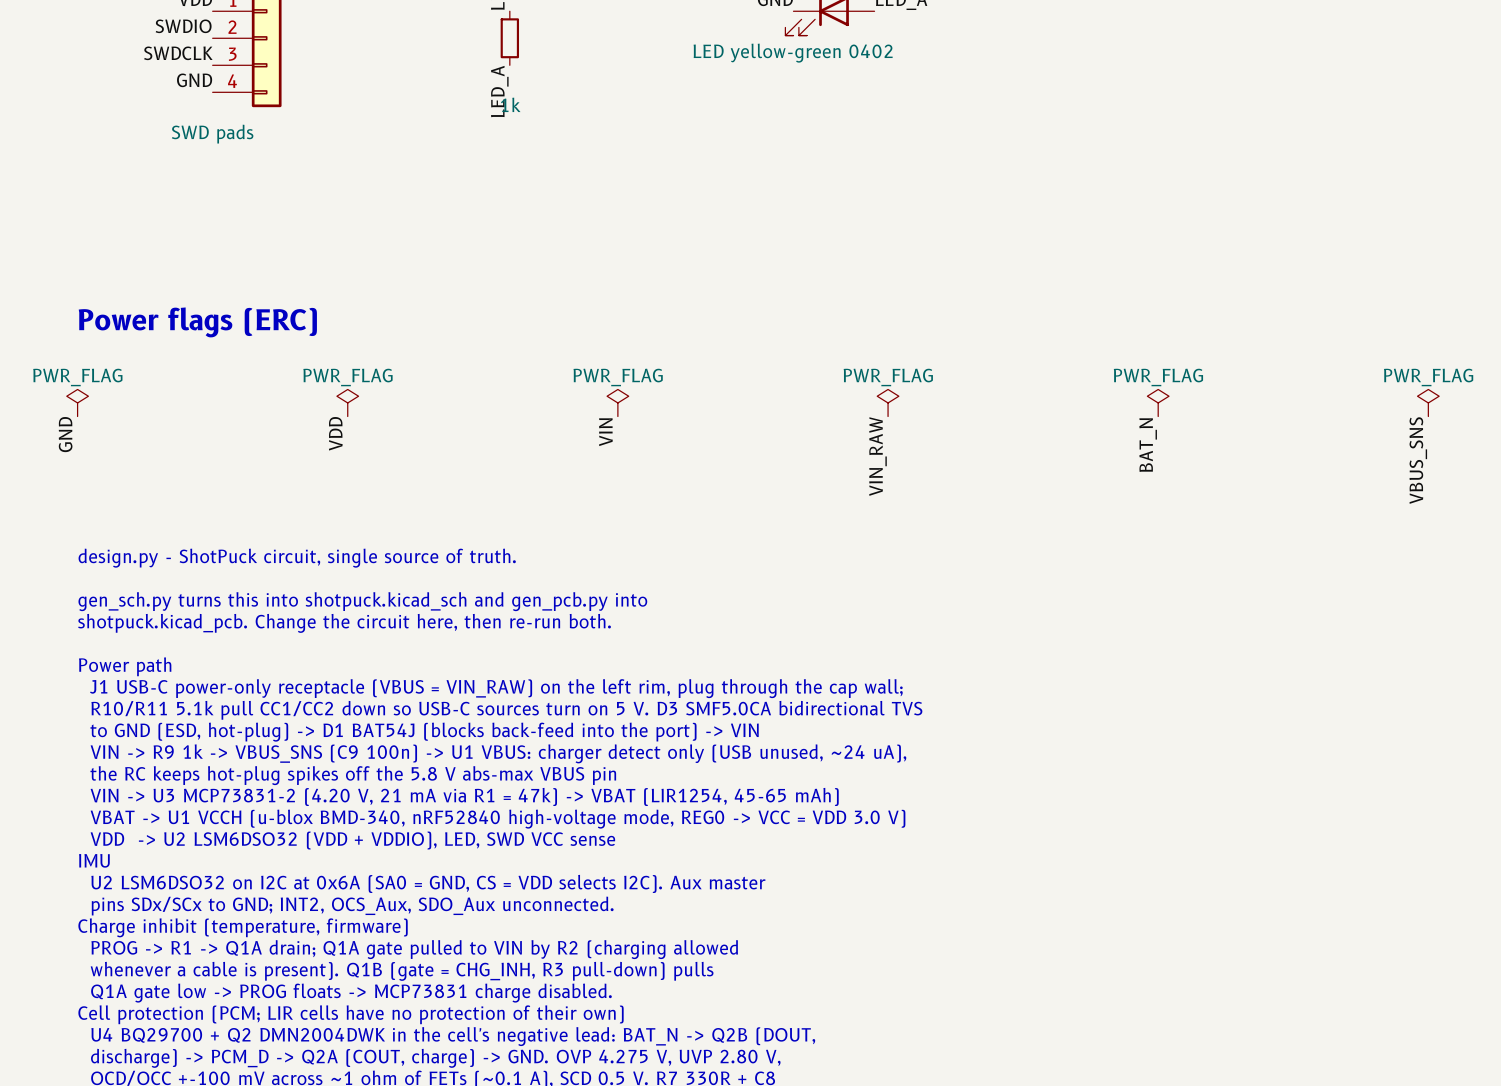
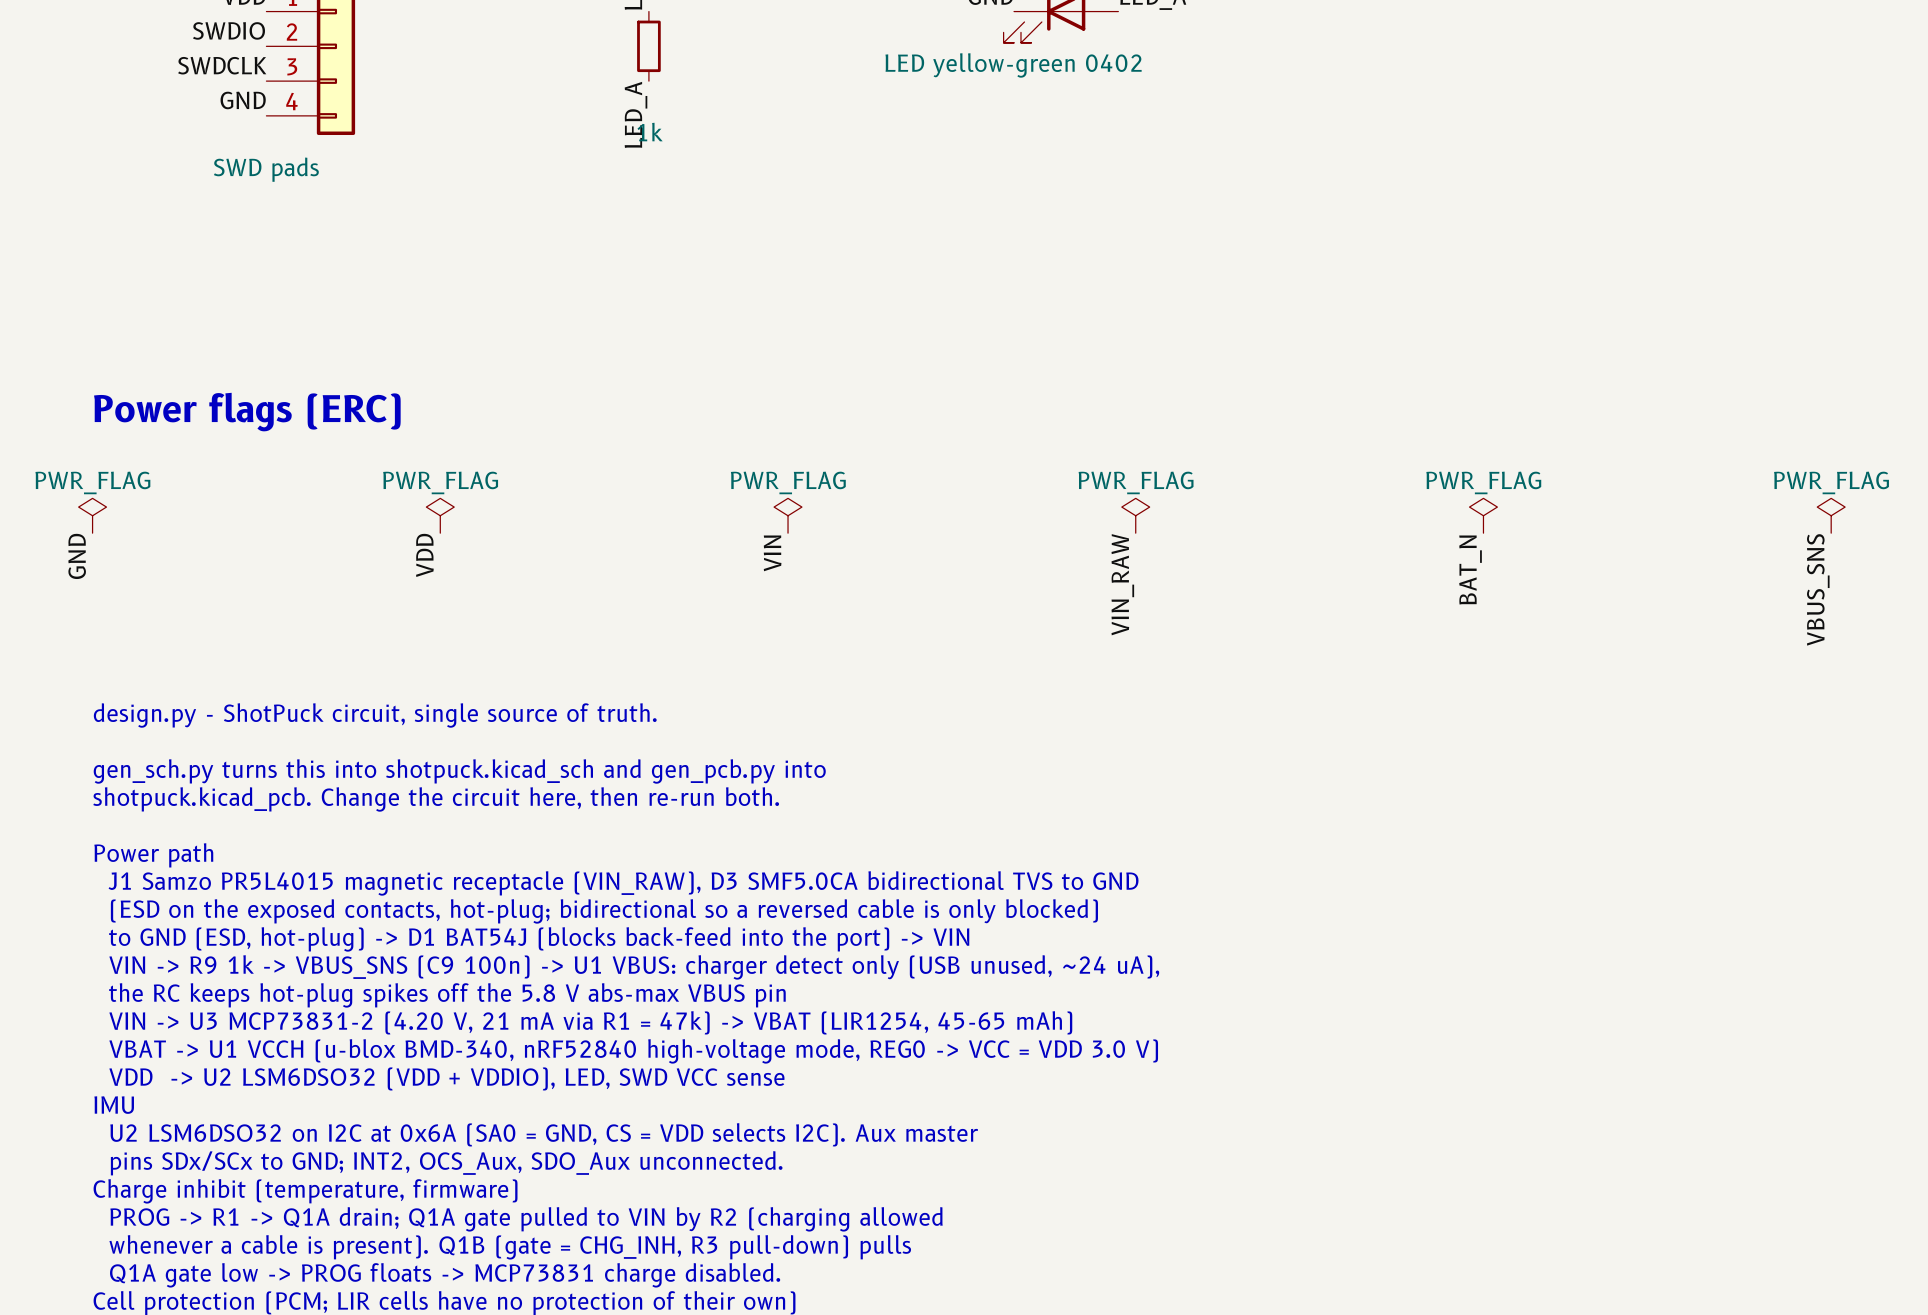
text: J1 USB-C power-only receptacle (VBUS = VIN_RAW) on the left rim, plug through the cap wall; (496, 688) -> J1 Samzo PR5L4015 magnetic receptacle (VIN_RAW), D3 SMF5.0CA bidirectional TVS to GND (623, 883)
text: R10/R11 5.1k pull CC1/CC2 down so USB-C sources turn on 5 V. D3 SMF5.0CA bidirectional TVS (506, 710) -> (ESD on the exposed contacts, hot-plug; bidirectional so a reversed cable is only blocked) (604, 911)

